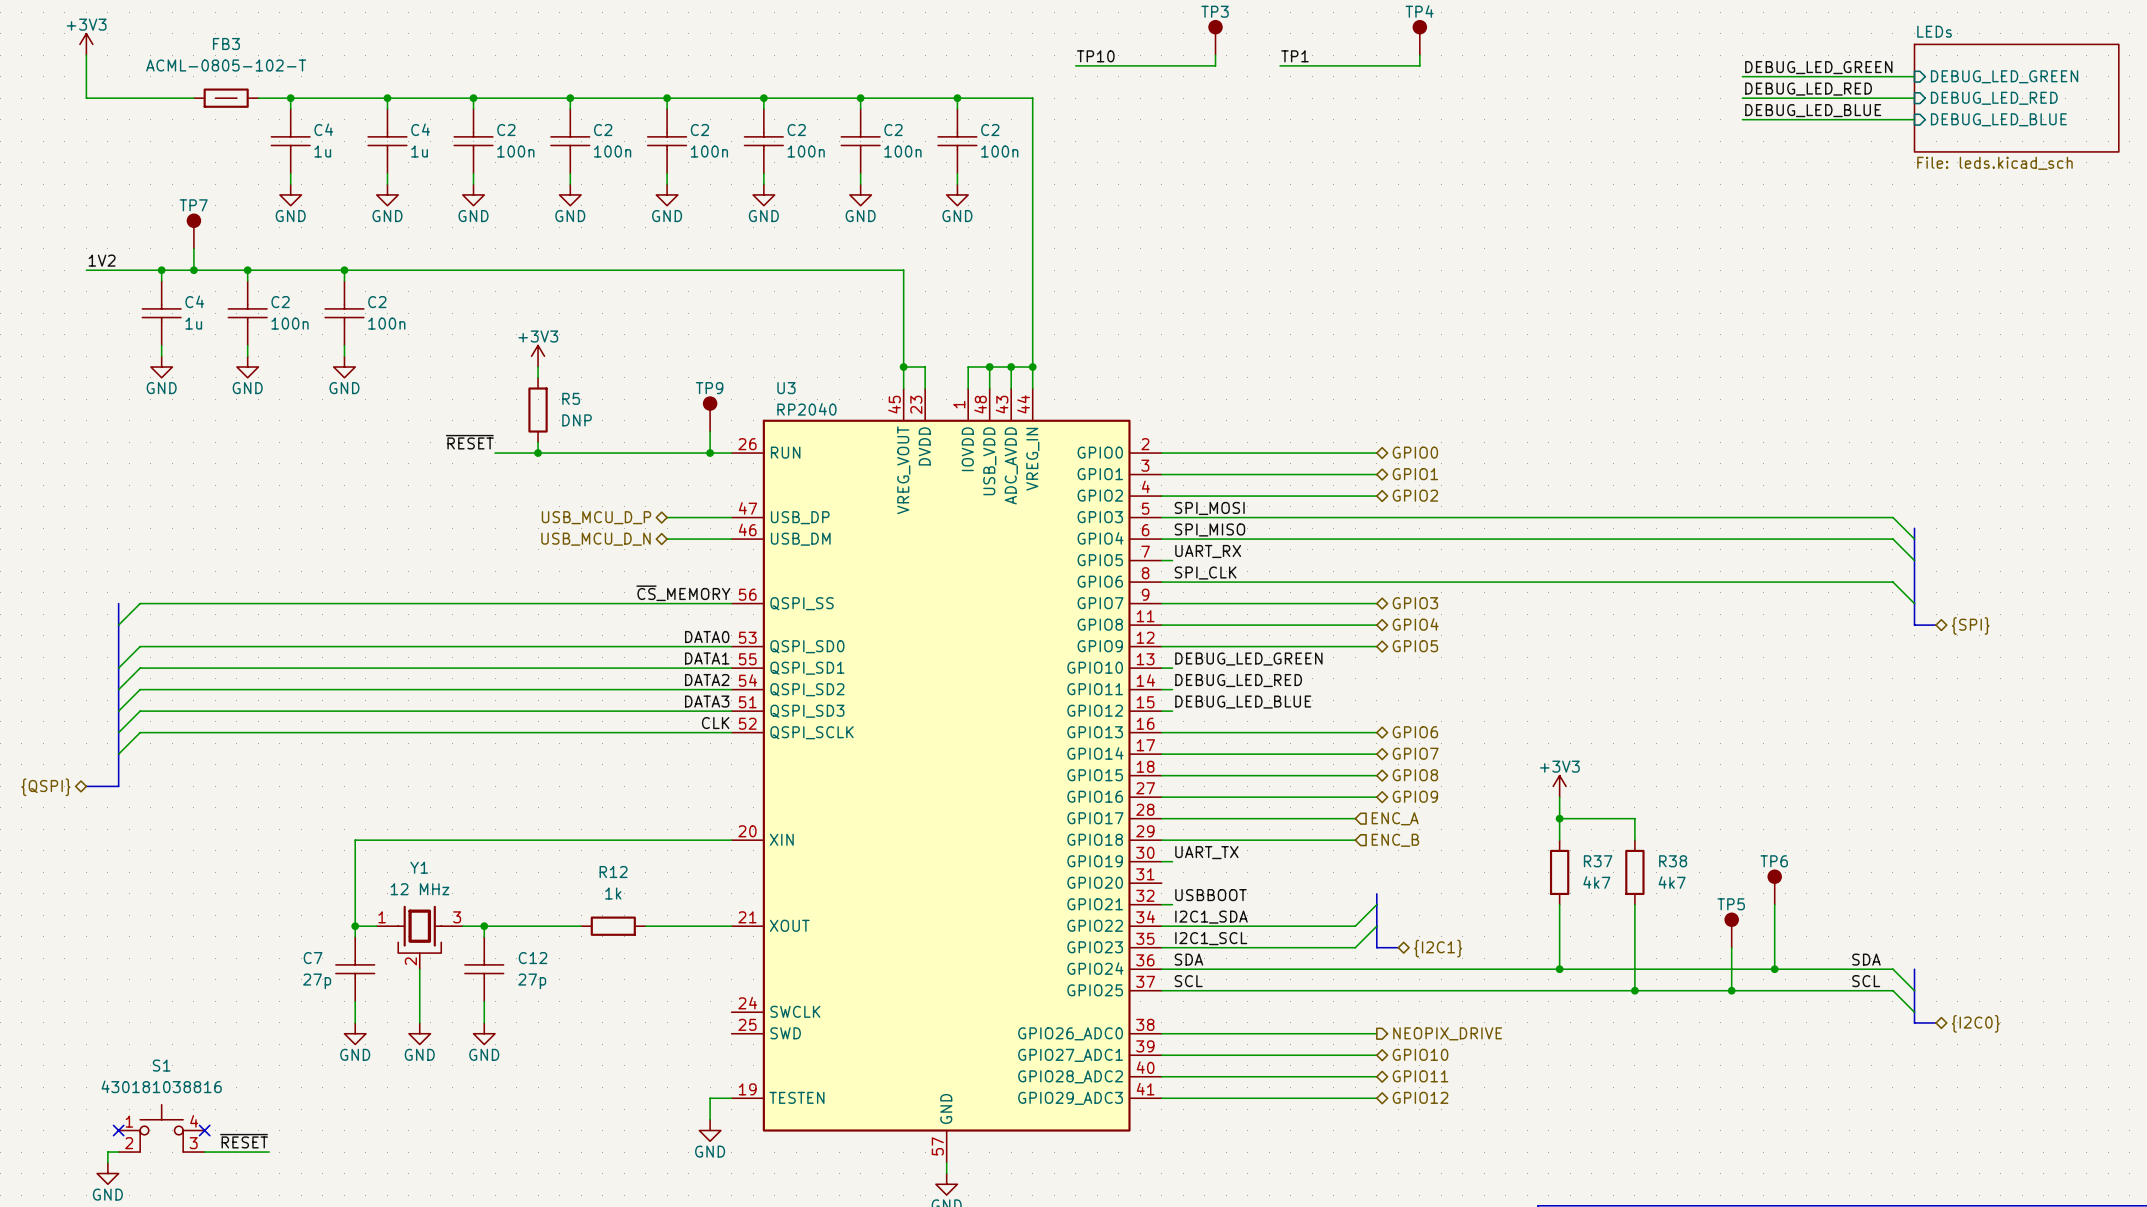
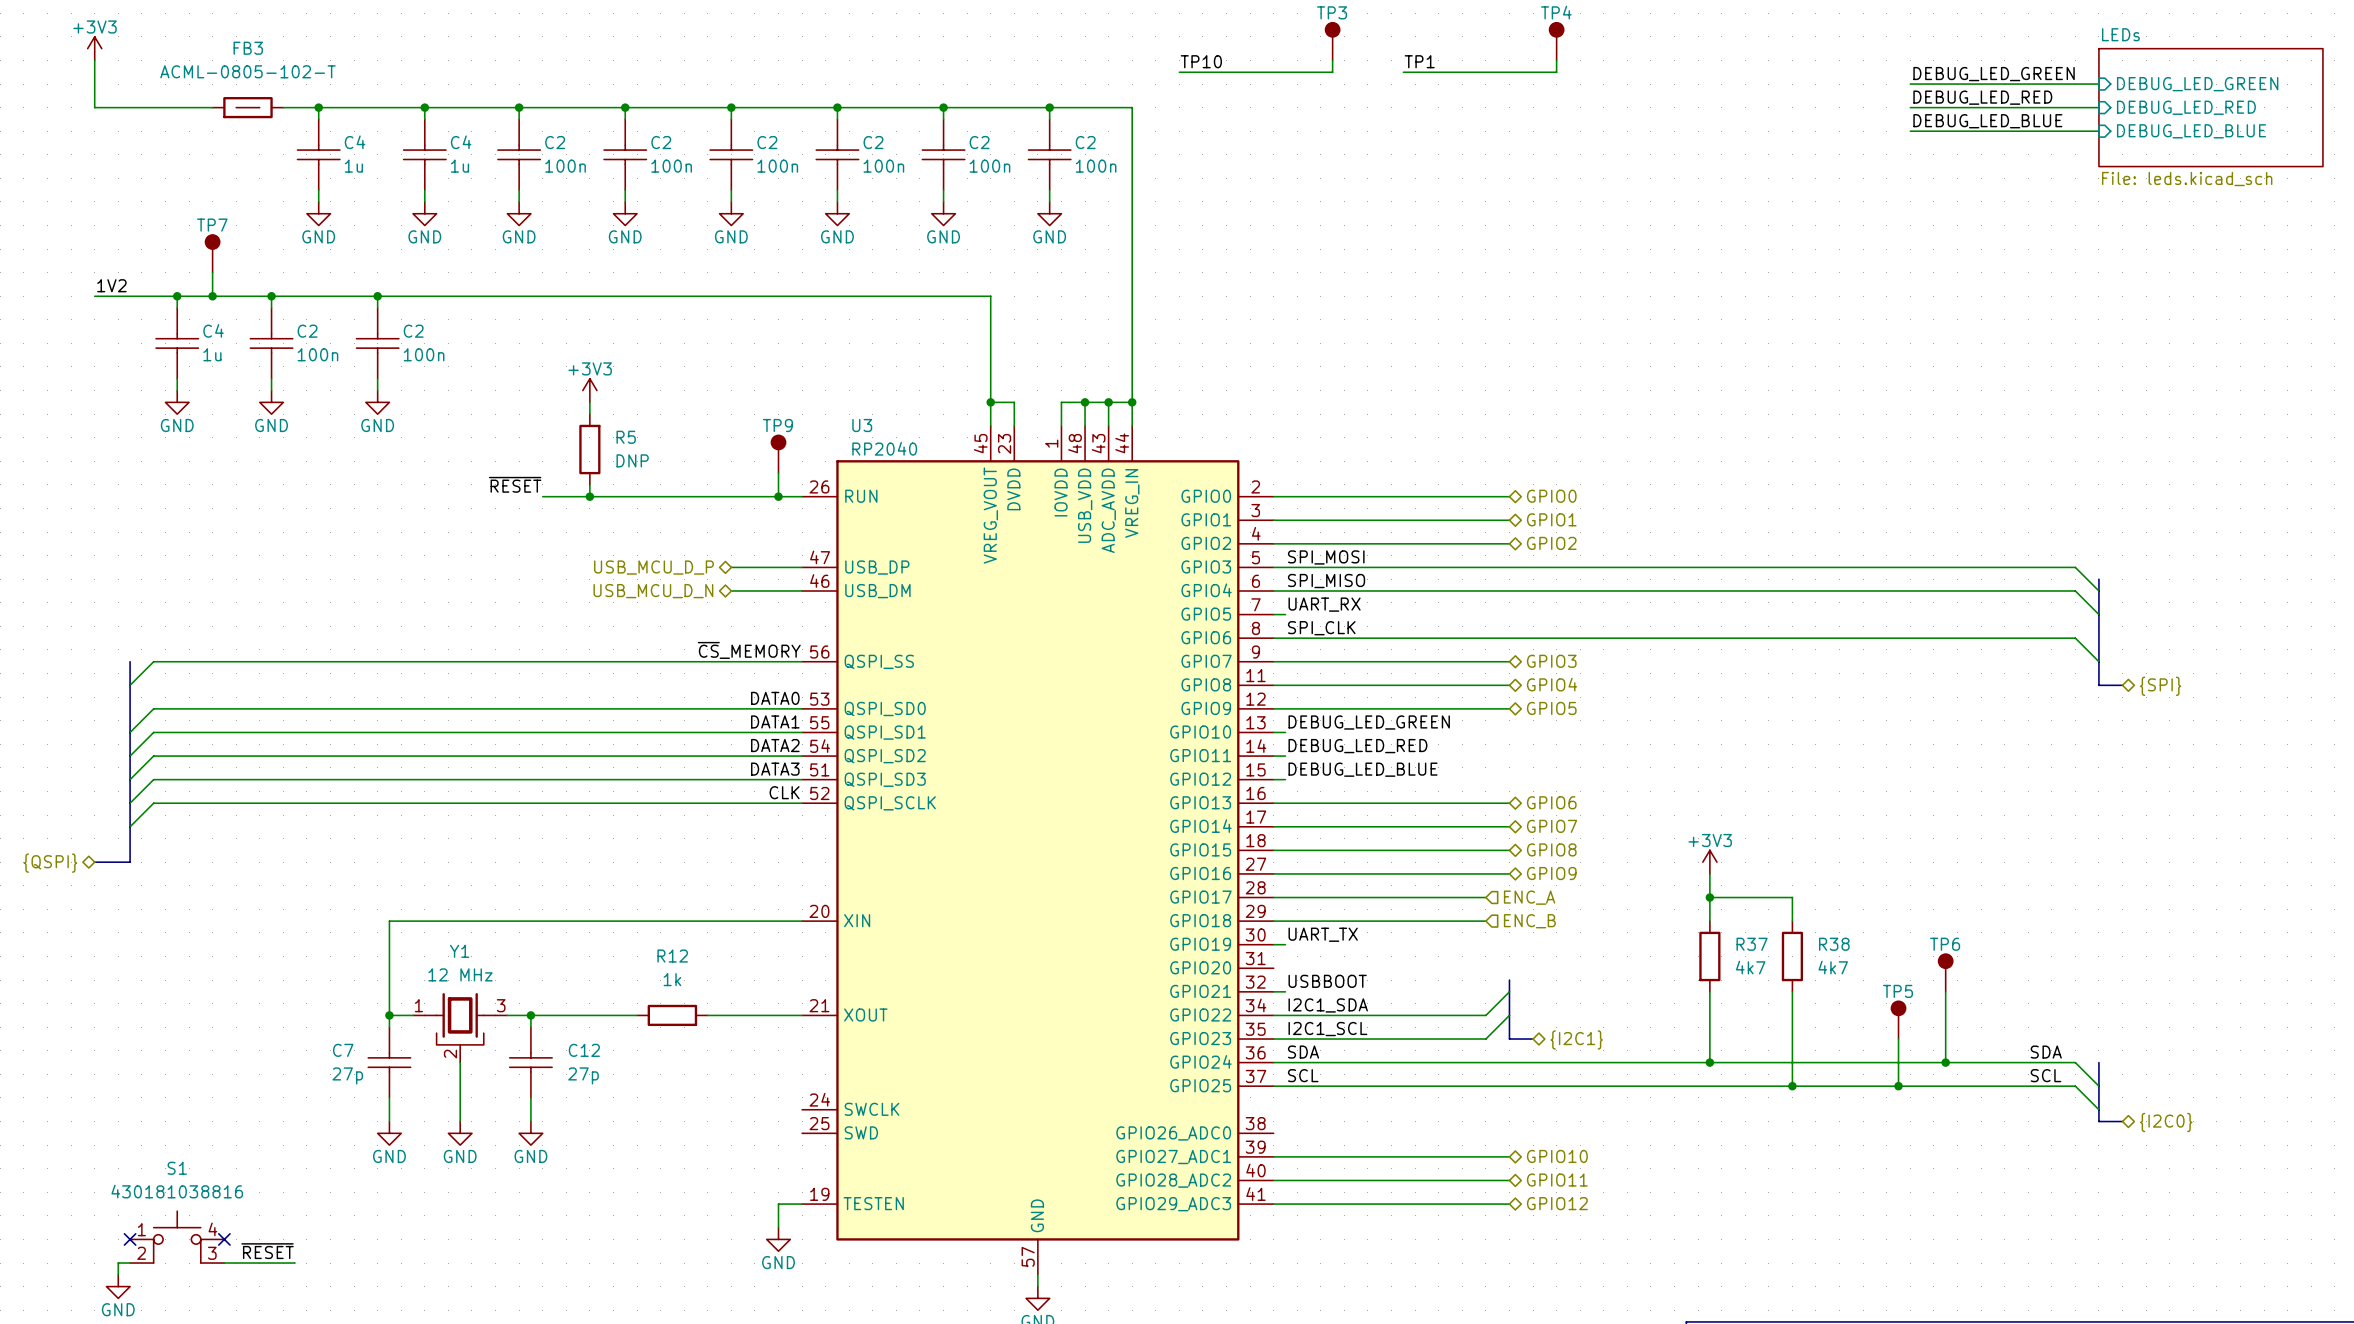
wire: (1161, 1033) (1376, 1033) -> none
hierarchical label: NEOPIX_DRIVE (1447, 1033) -> none

